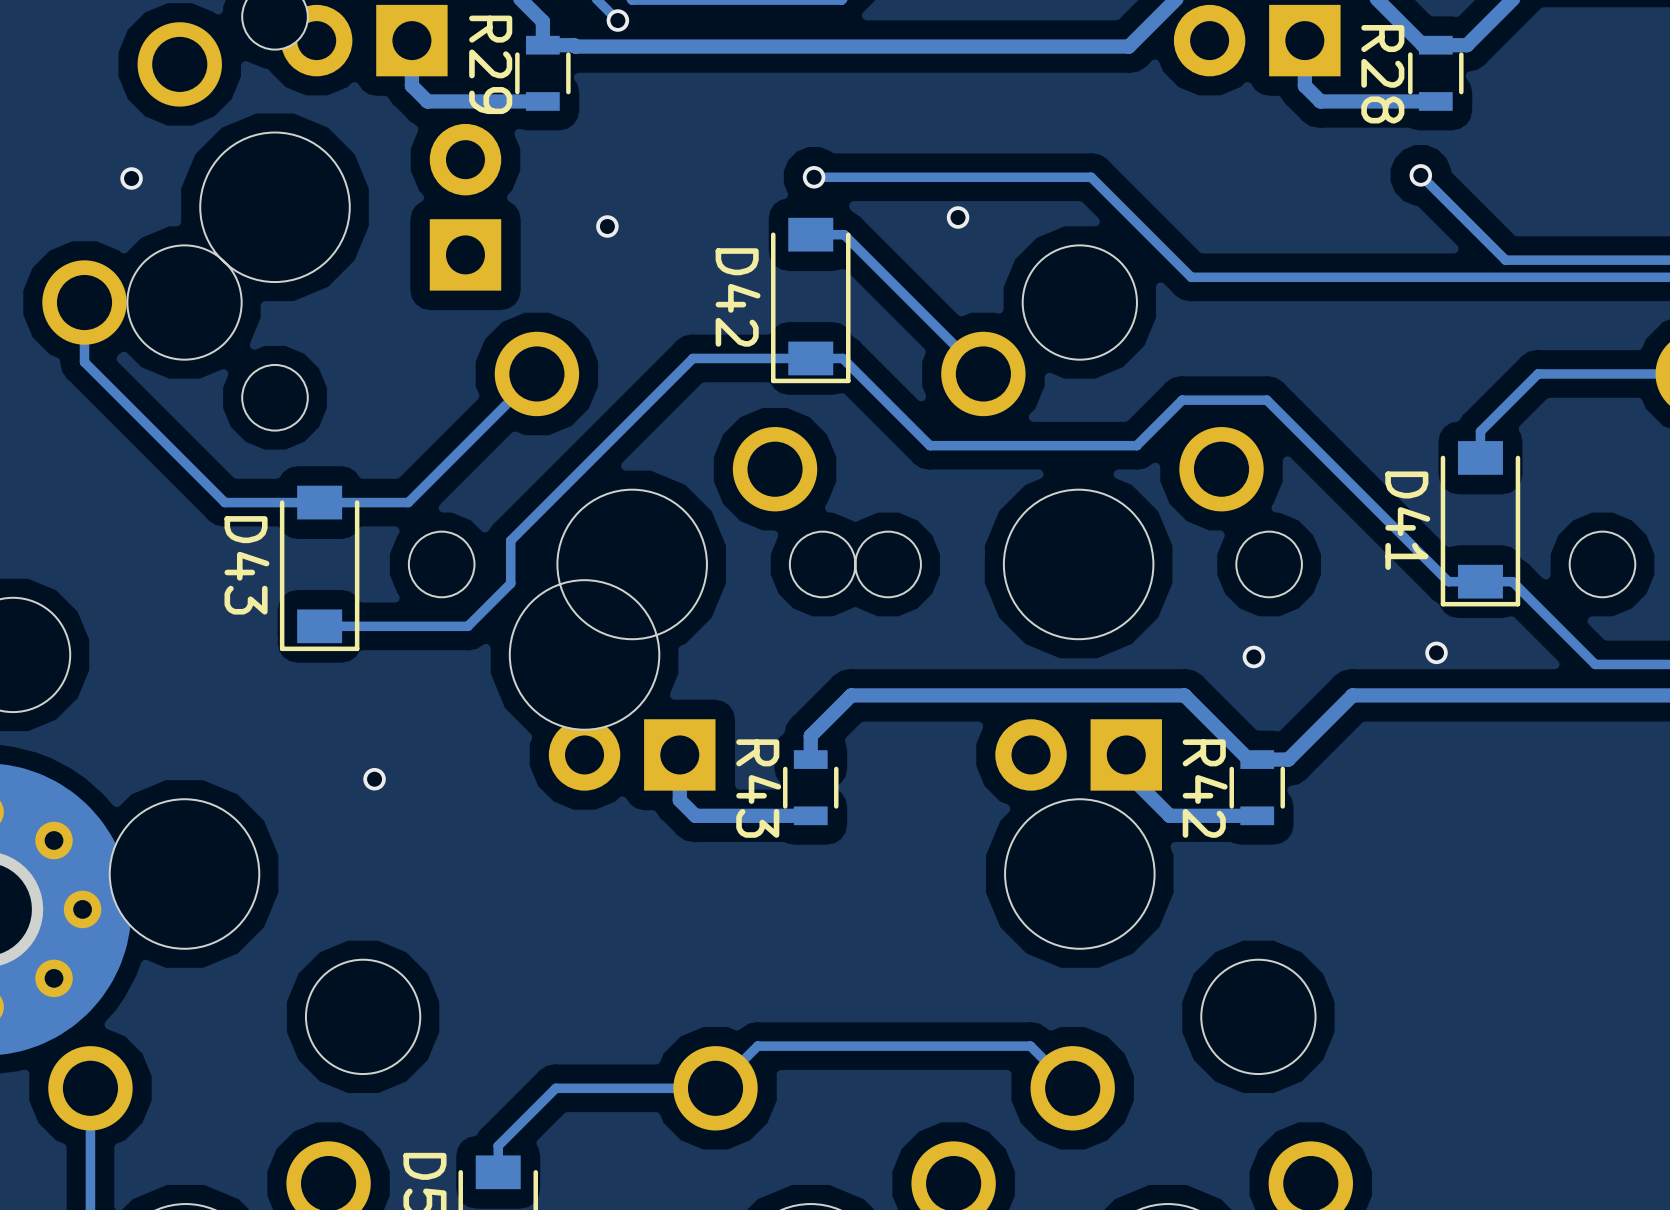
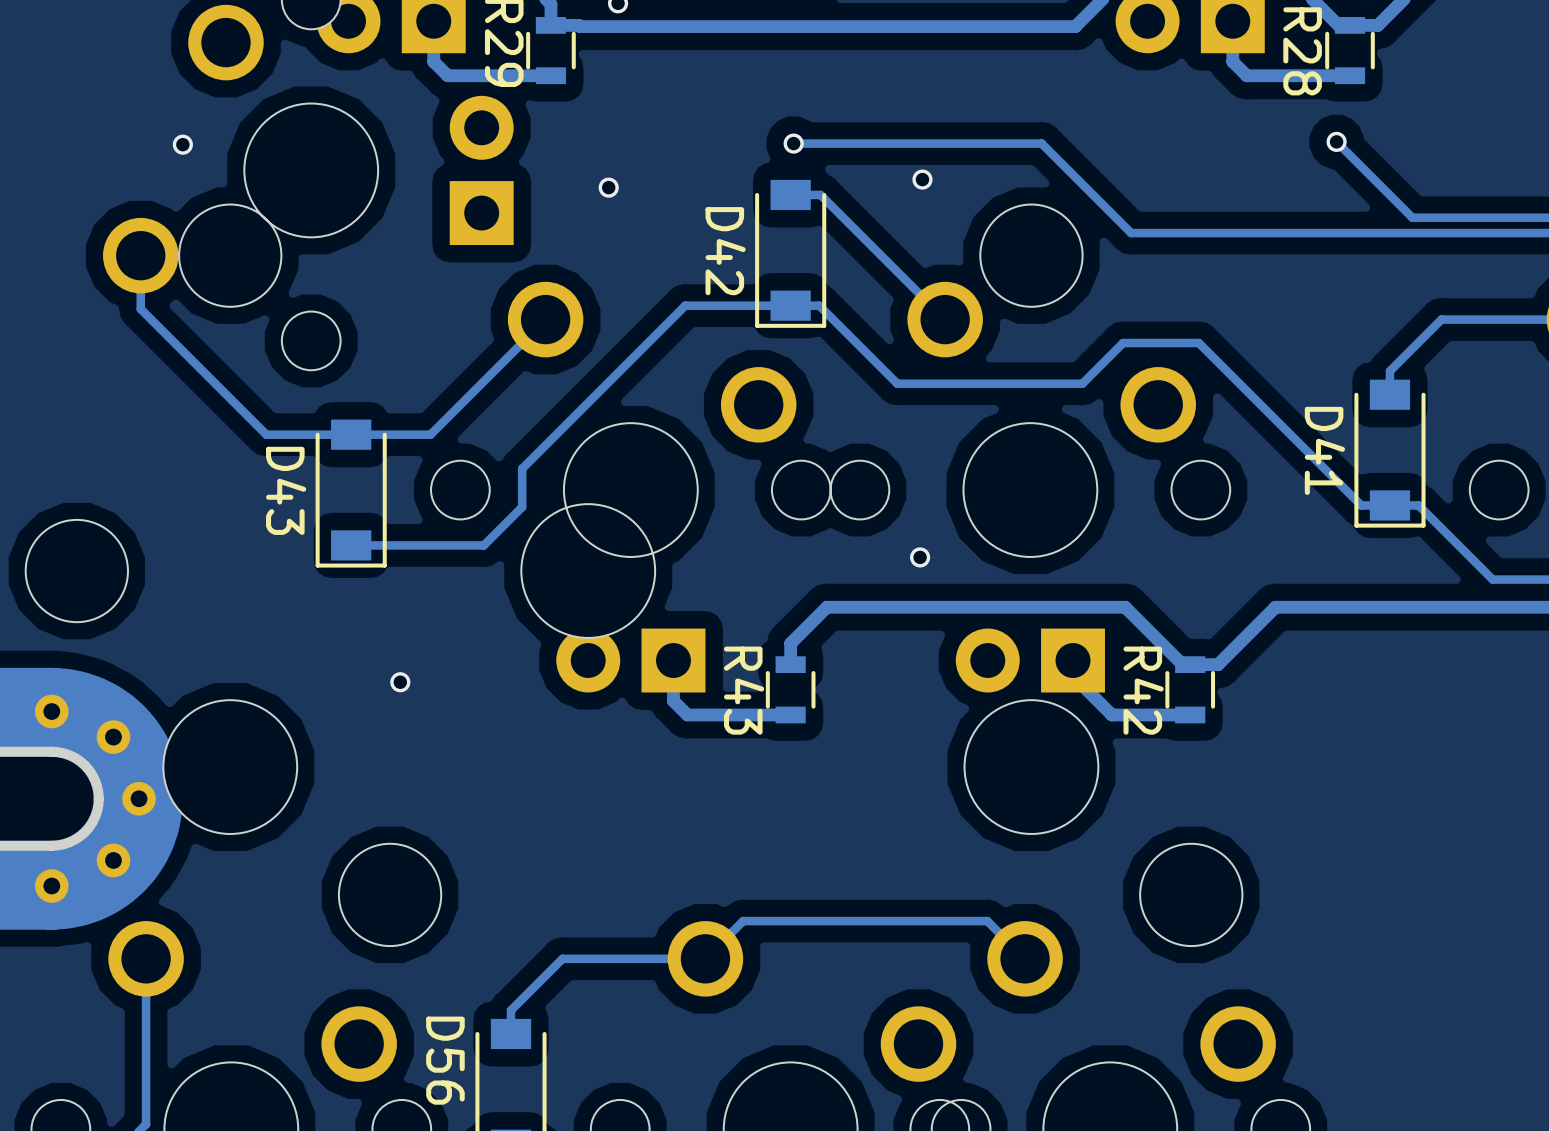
via: none -> (920, 557)
via: (1436, 652) -> none
via: (1253, 656) -> none

